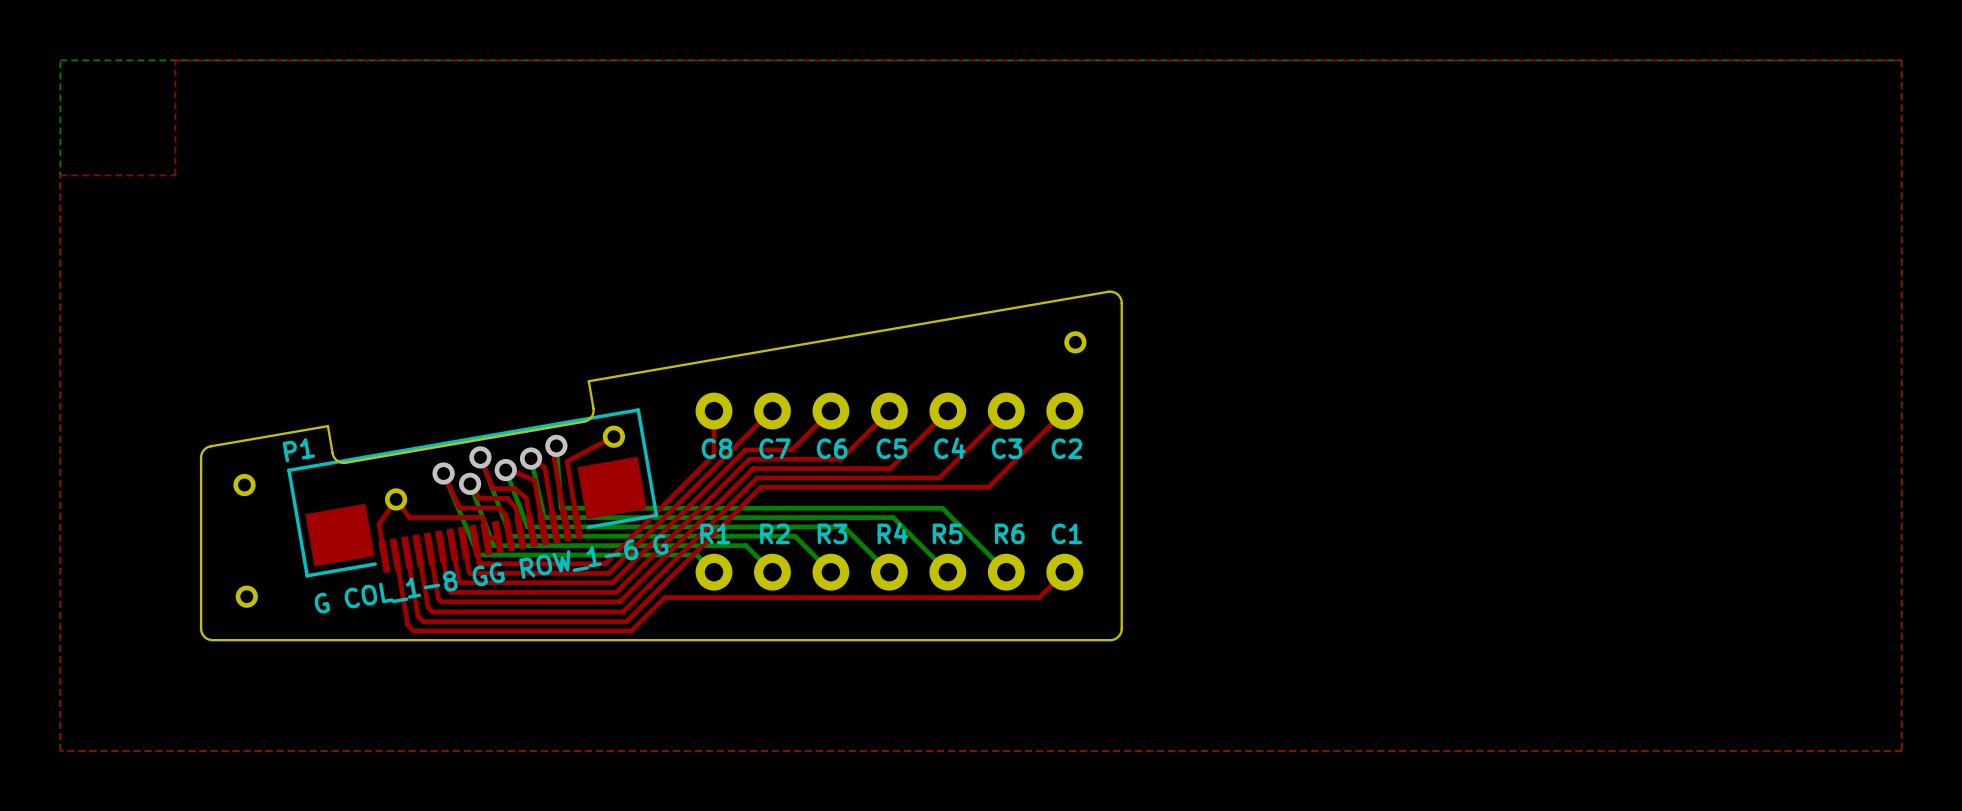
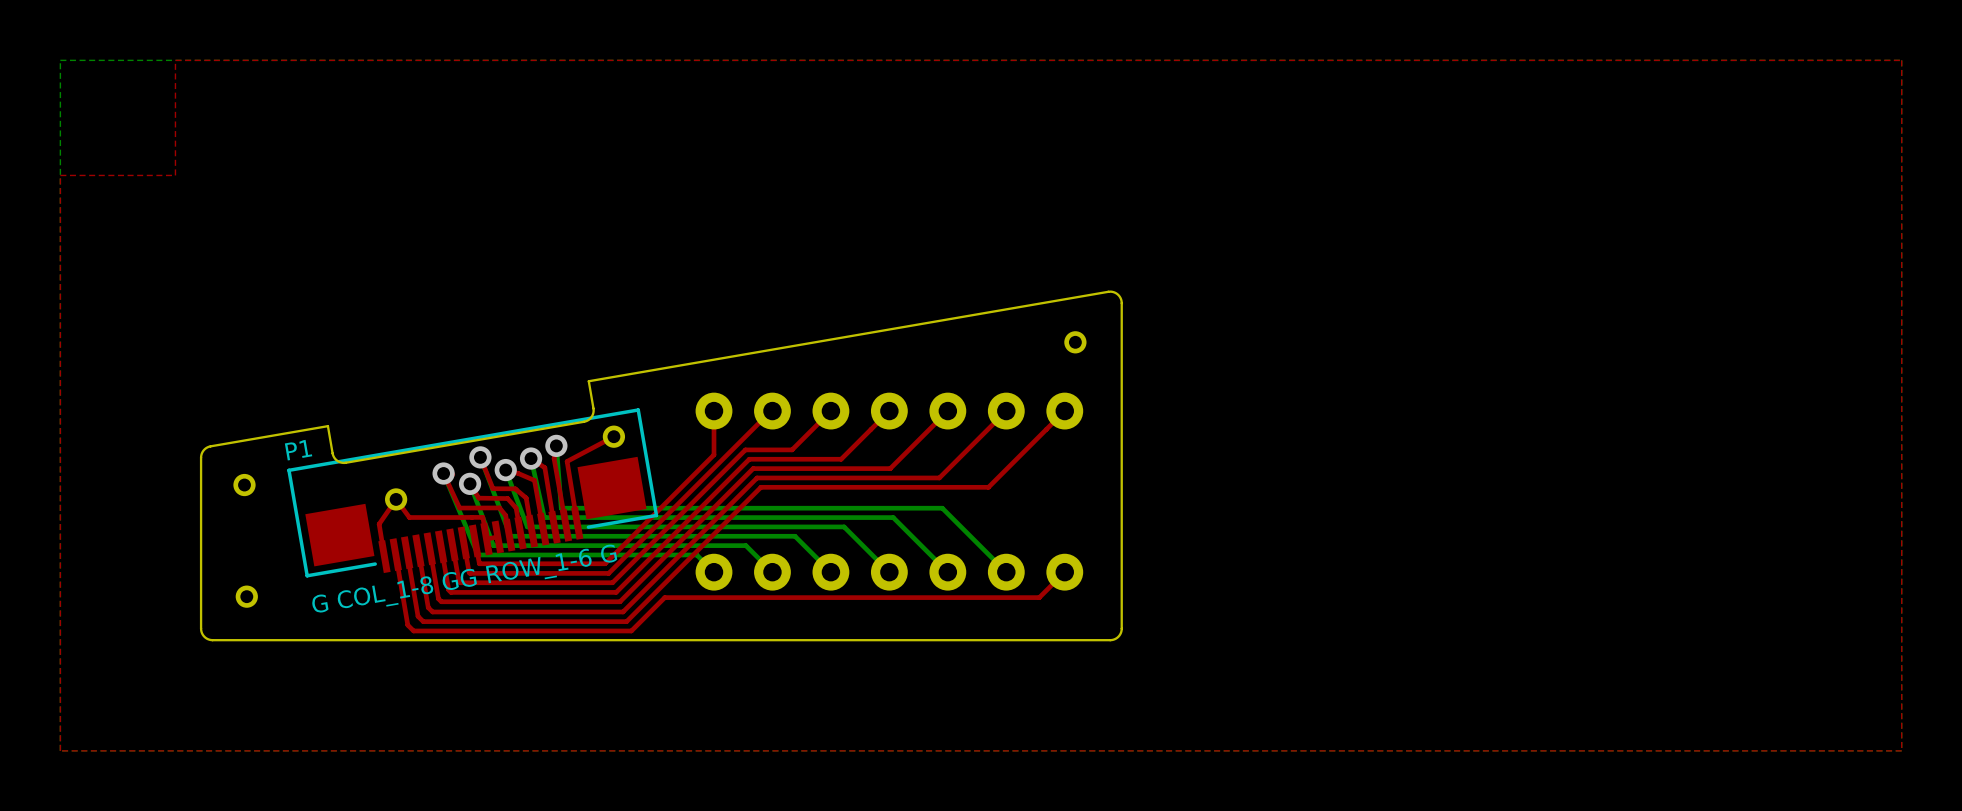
text: C8 (717, 448) -> none
text: C7 (775, 448) -> none
text: C6 (832, 448) -> none
text: C5 (891, 448) -> none
text: C4 (949, 448) -> none
text: C3 (1007, 448) -> none
text: C2 (1066, 448) -> none
text: R1 (715, 533) -> none
text: R2 (775, 533) -> none
text: R3 (832, 533) -> none
text: R4 (892, 533) -> none
text: R5 (947, 533) -> none
text: R6 (1009, 533) -> none
text: C1 (1066, 533) -> none

